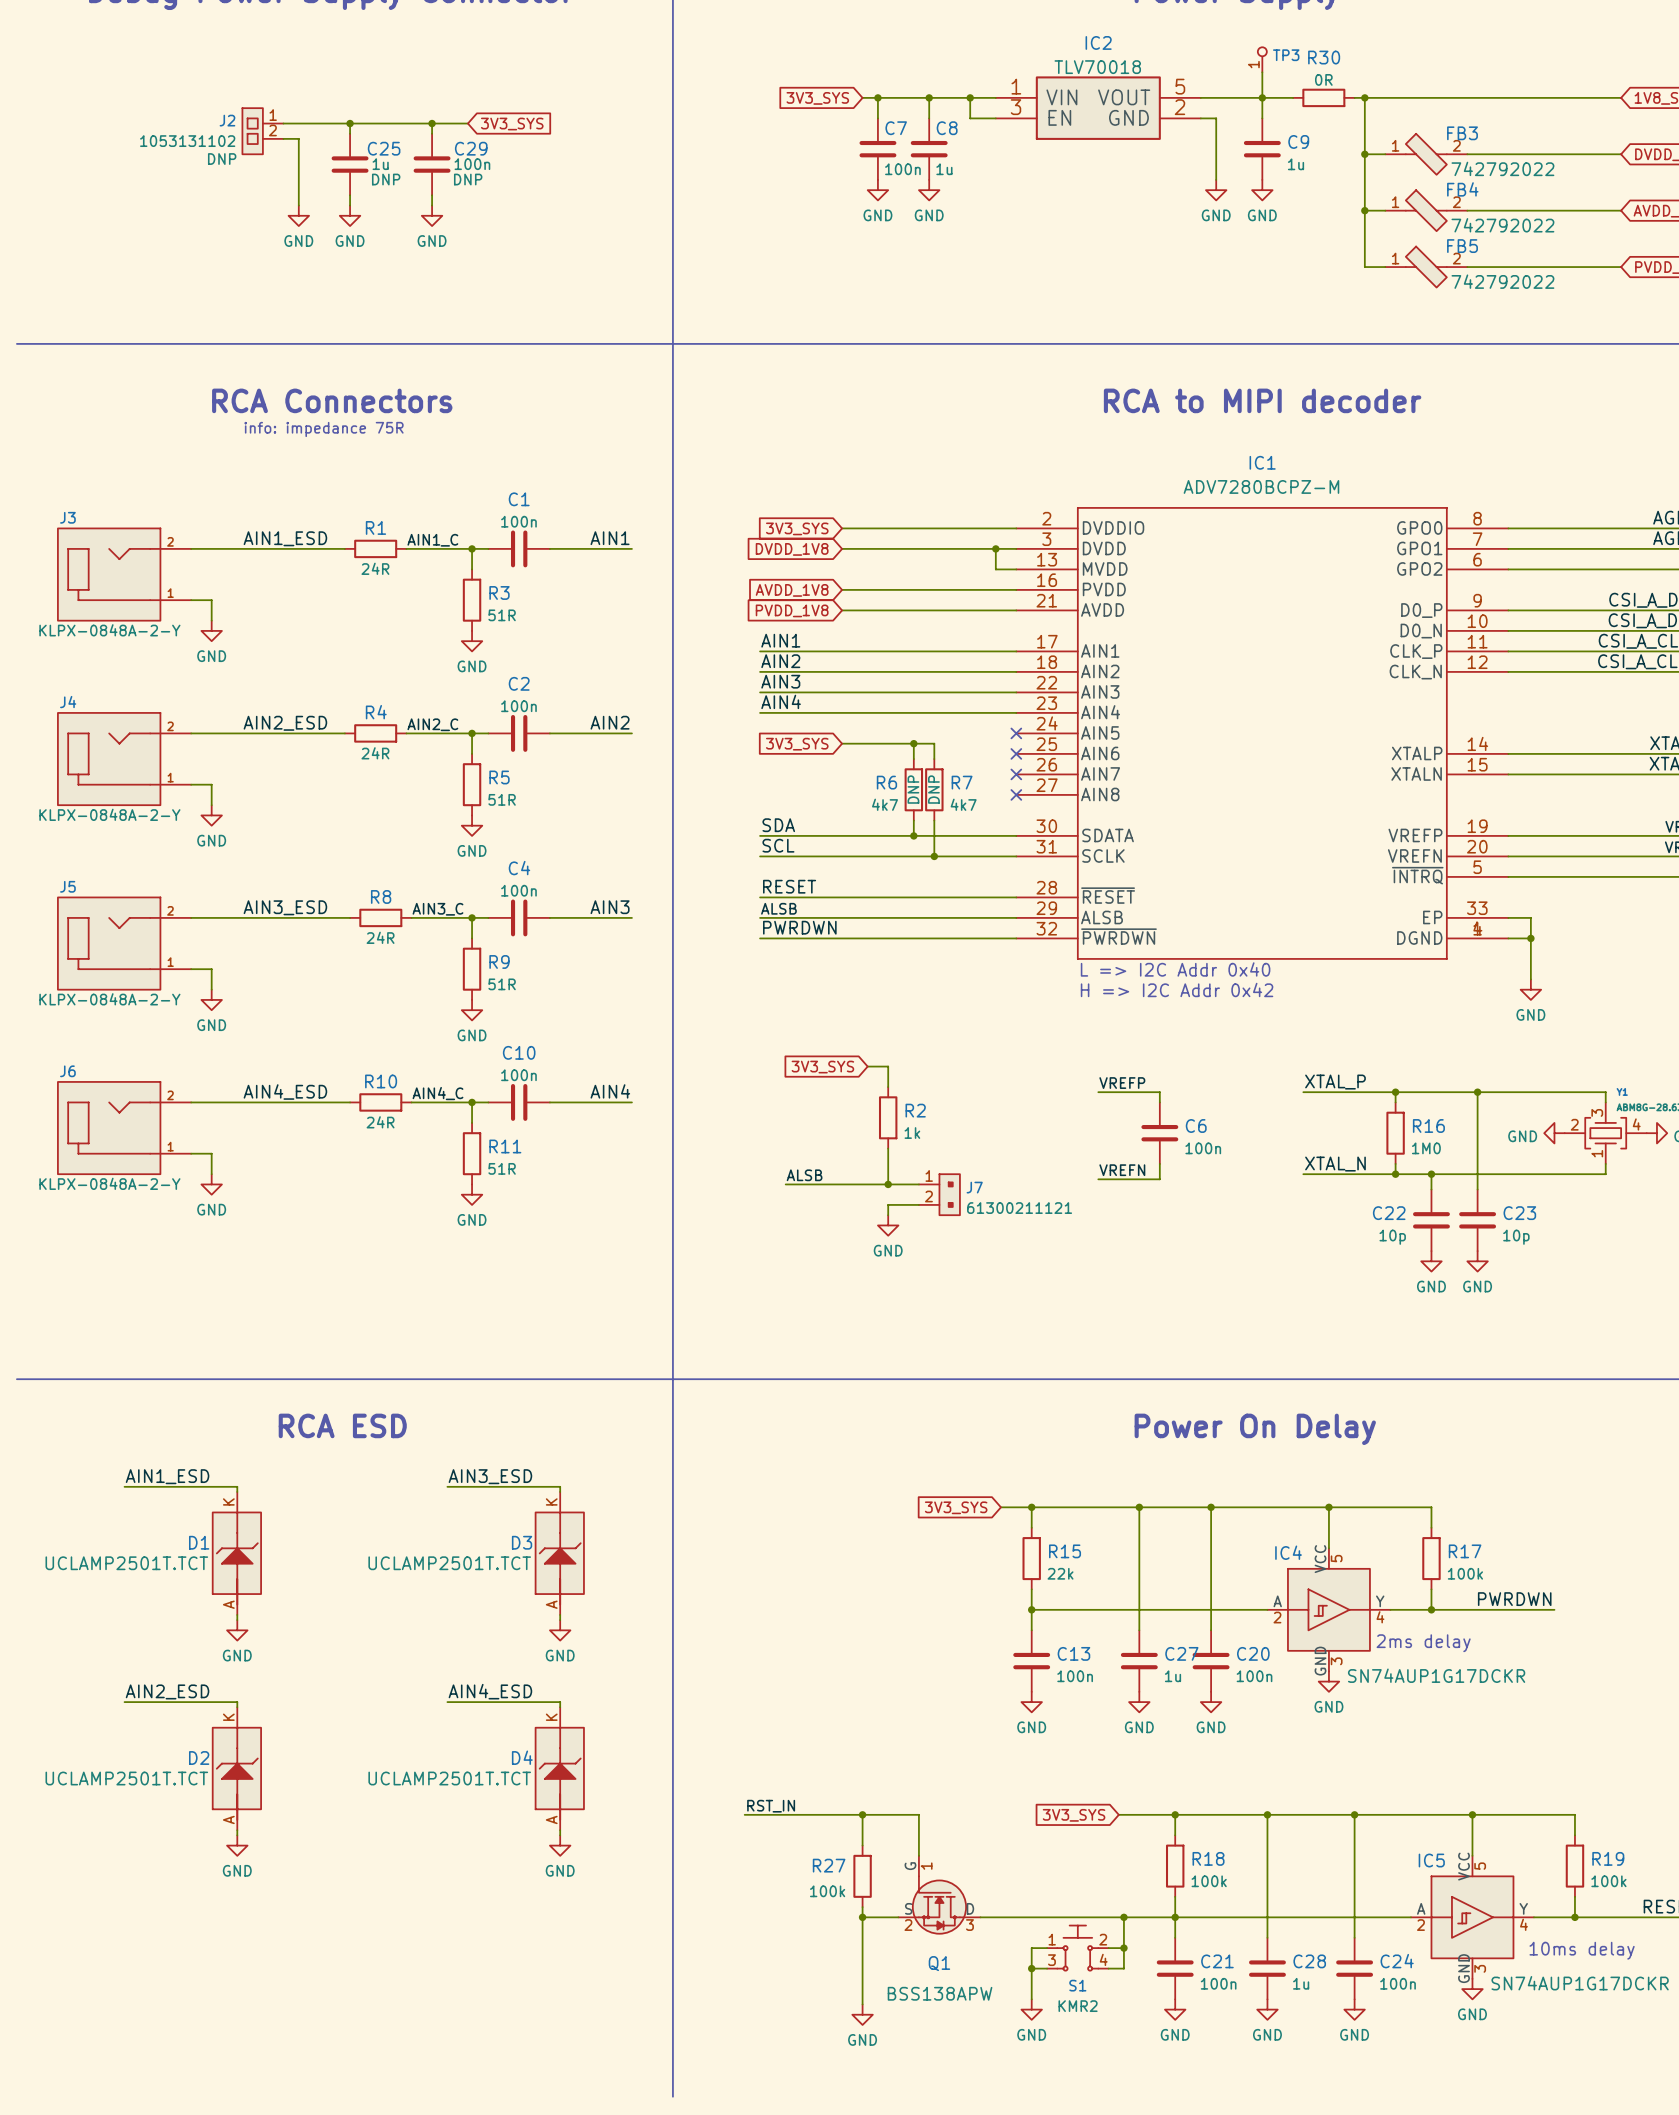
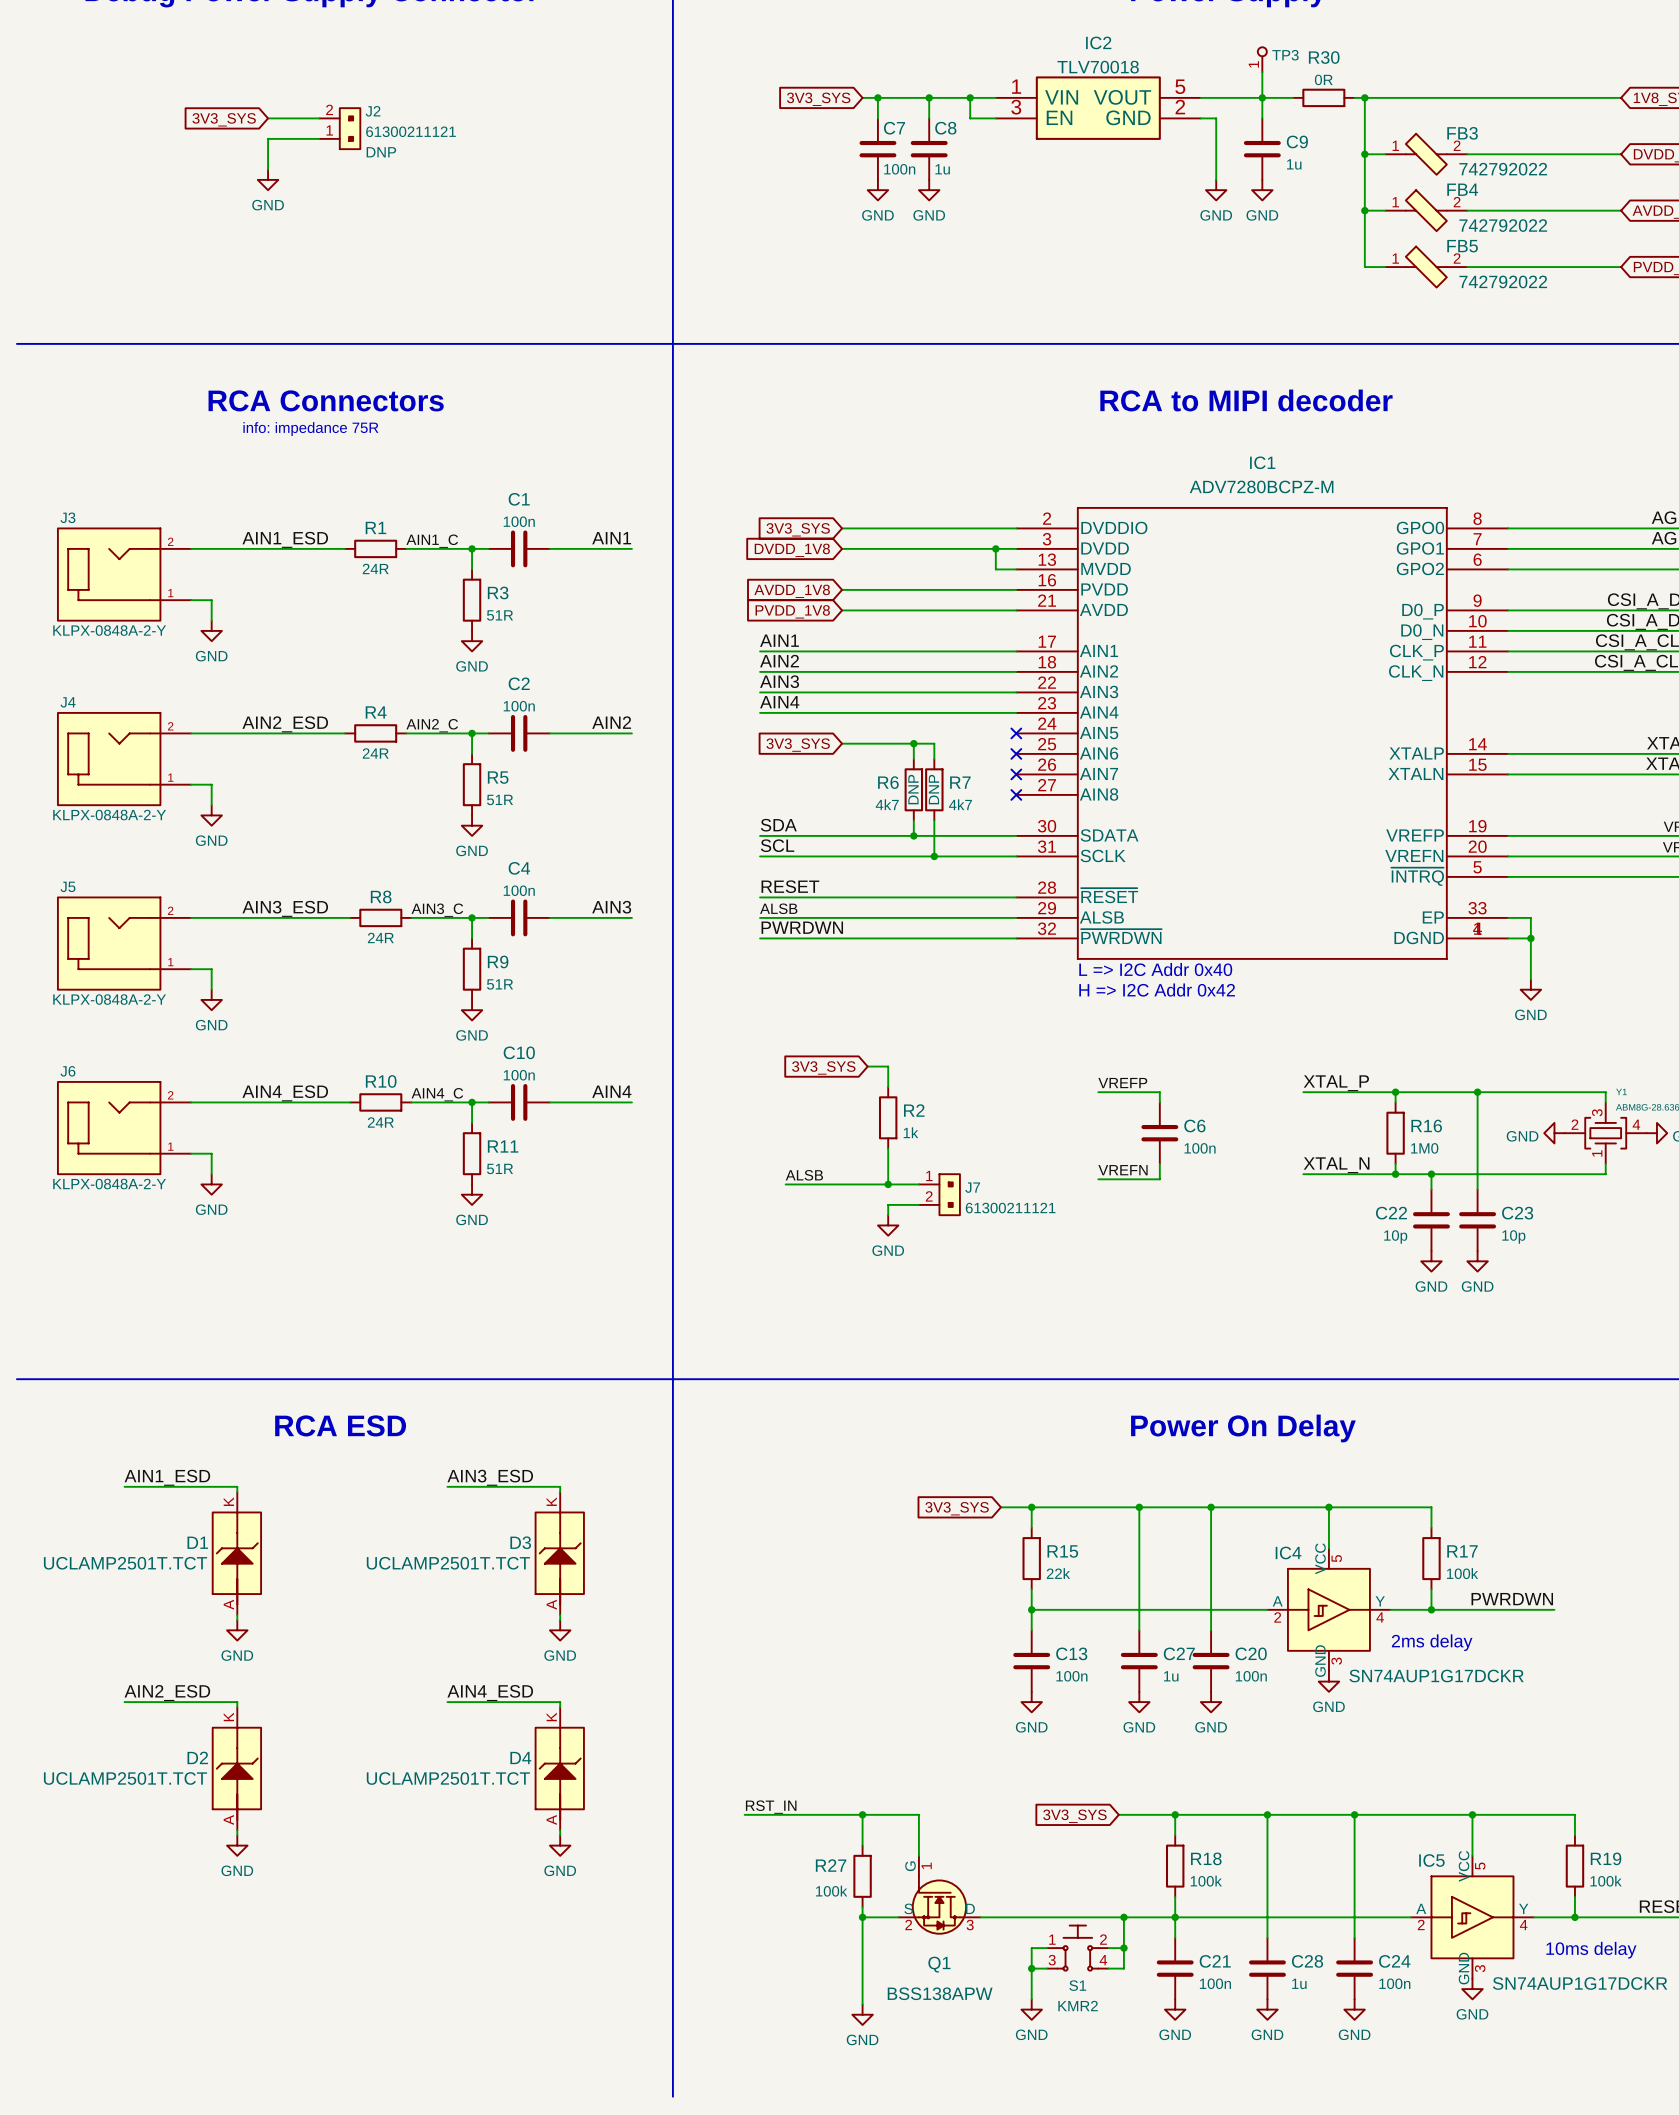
J2 symbol: [242, 108, 284, 155] -> [319, 108, 361, 150]
wire: none -> (268, 118) (319, 118)
J2 name position: J2 (227, 120) -> J2 (373, 111)
wire: (283, 123) (467, 123) -> none
junction: (350, 123) -> none
wire: (432, 123) (432, 133) -> none
junction: (432, 123) -> none
global label rotation: 0° (512, 124) -> 180° (224, 119)
global label position: 3V3_SYS (512, 124) -> 3V3_SYS (224, 119)
wire: none -> (283, 138) (268, 138) (268, 169)
wire: (298, 138) (298, 205) -> (298, 138) (319, 138)
J2 value: 1053131102 (187, 141) -> 61300211121 (411, 131)
J2 text position: DNP (222, 159) -> DNP (381, 152)
C25: (350, 164) -> none
C29: (432, 164) -> none
power symbol: none -> GND (268, 179)
wire: (350, 195) (350, 205) -> none
wire: (432, 195) (432, 205) -> none
power symbol: GND (298, 215) -> none
power symbol: GND (350, 215) -> none
power symbol: GND (432, 215) -> none

